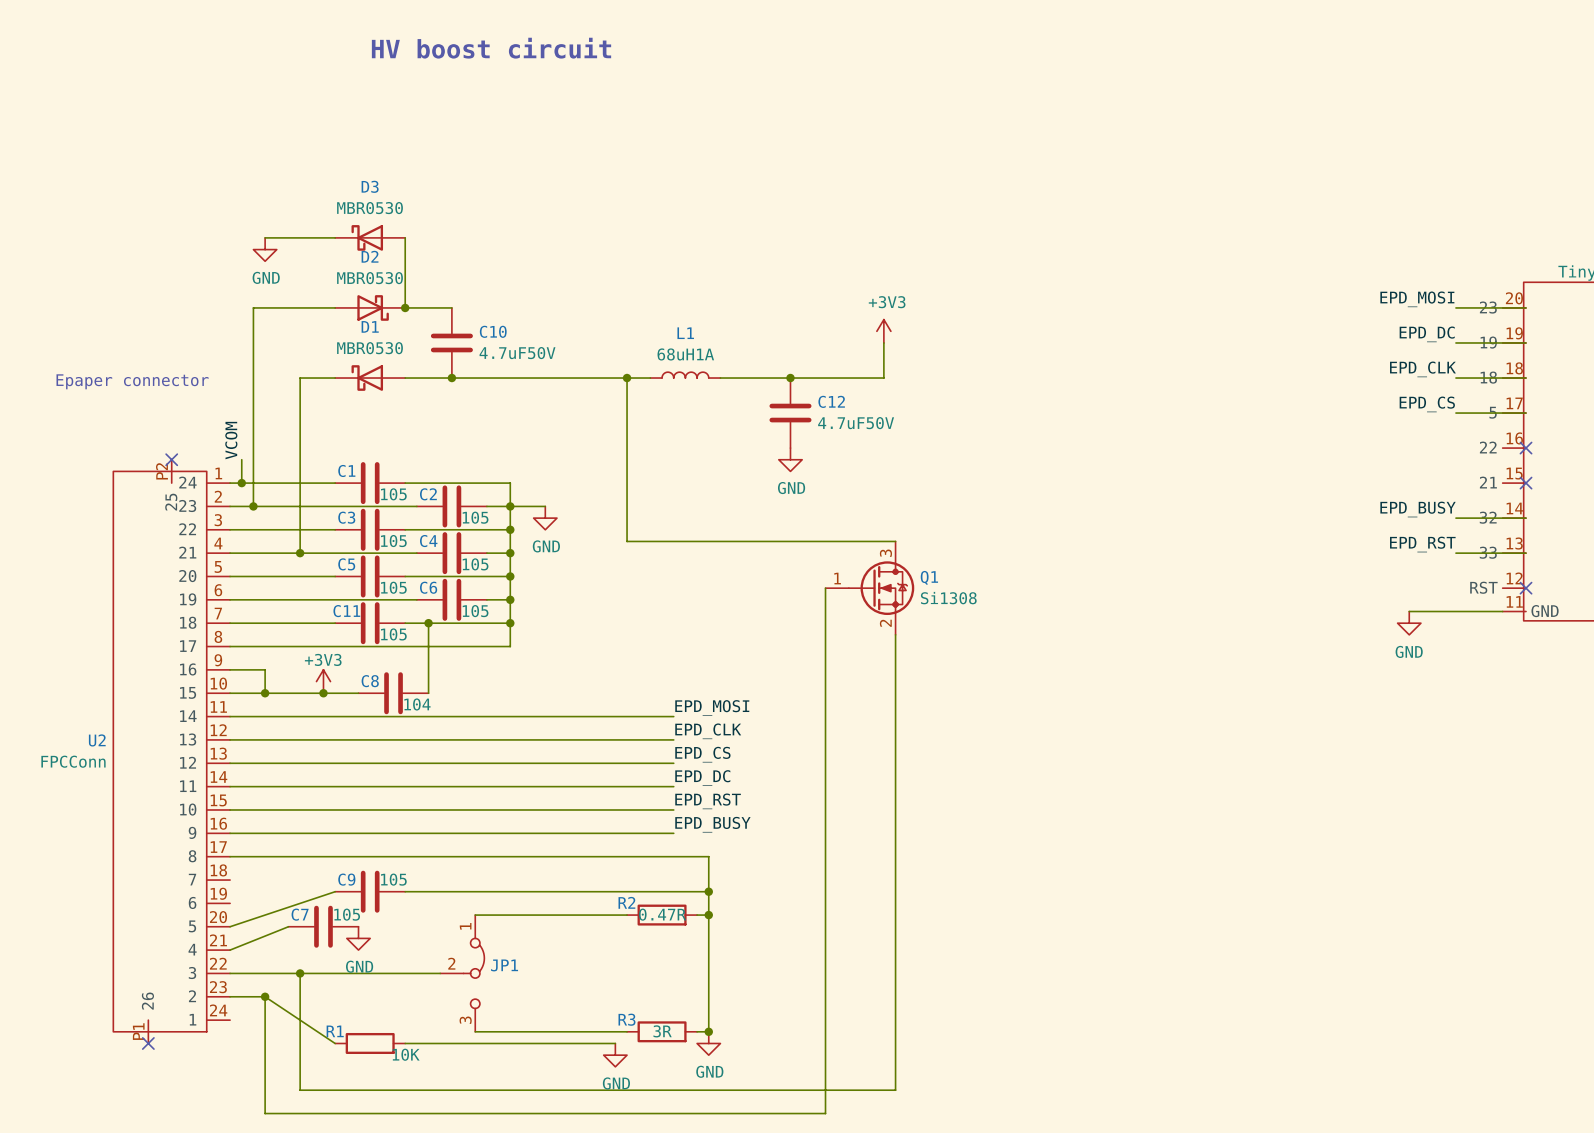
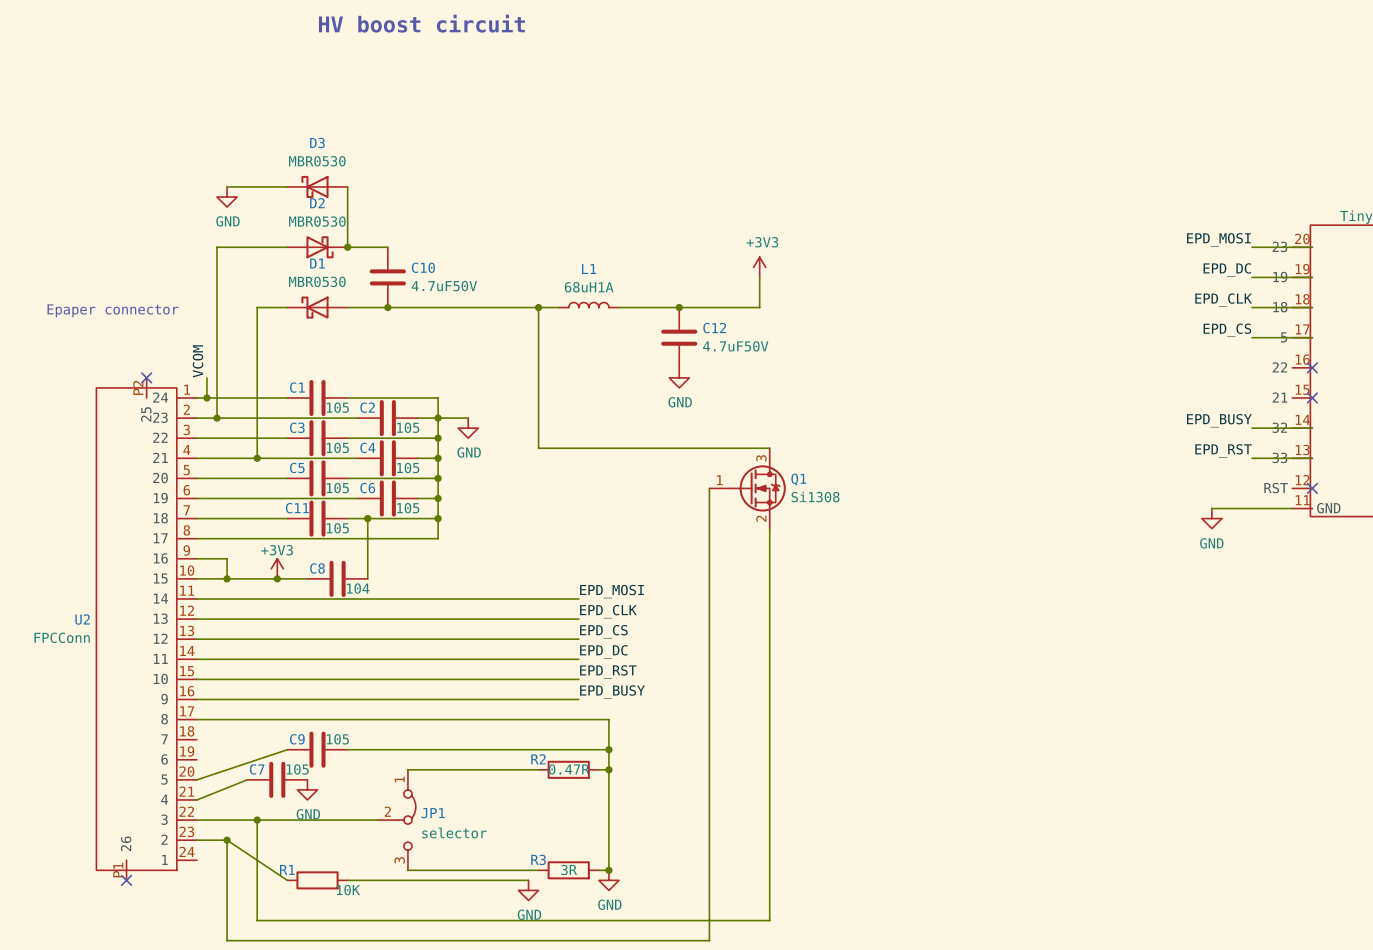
JP1 value: none -> selector (454, 833)

